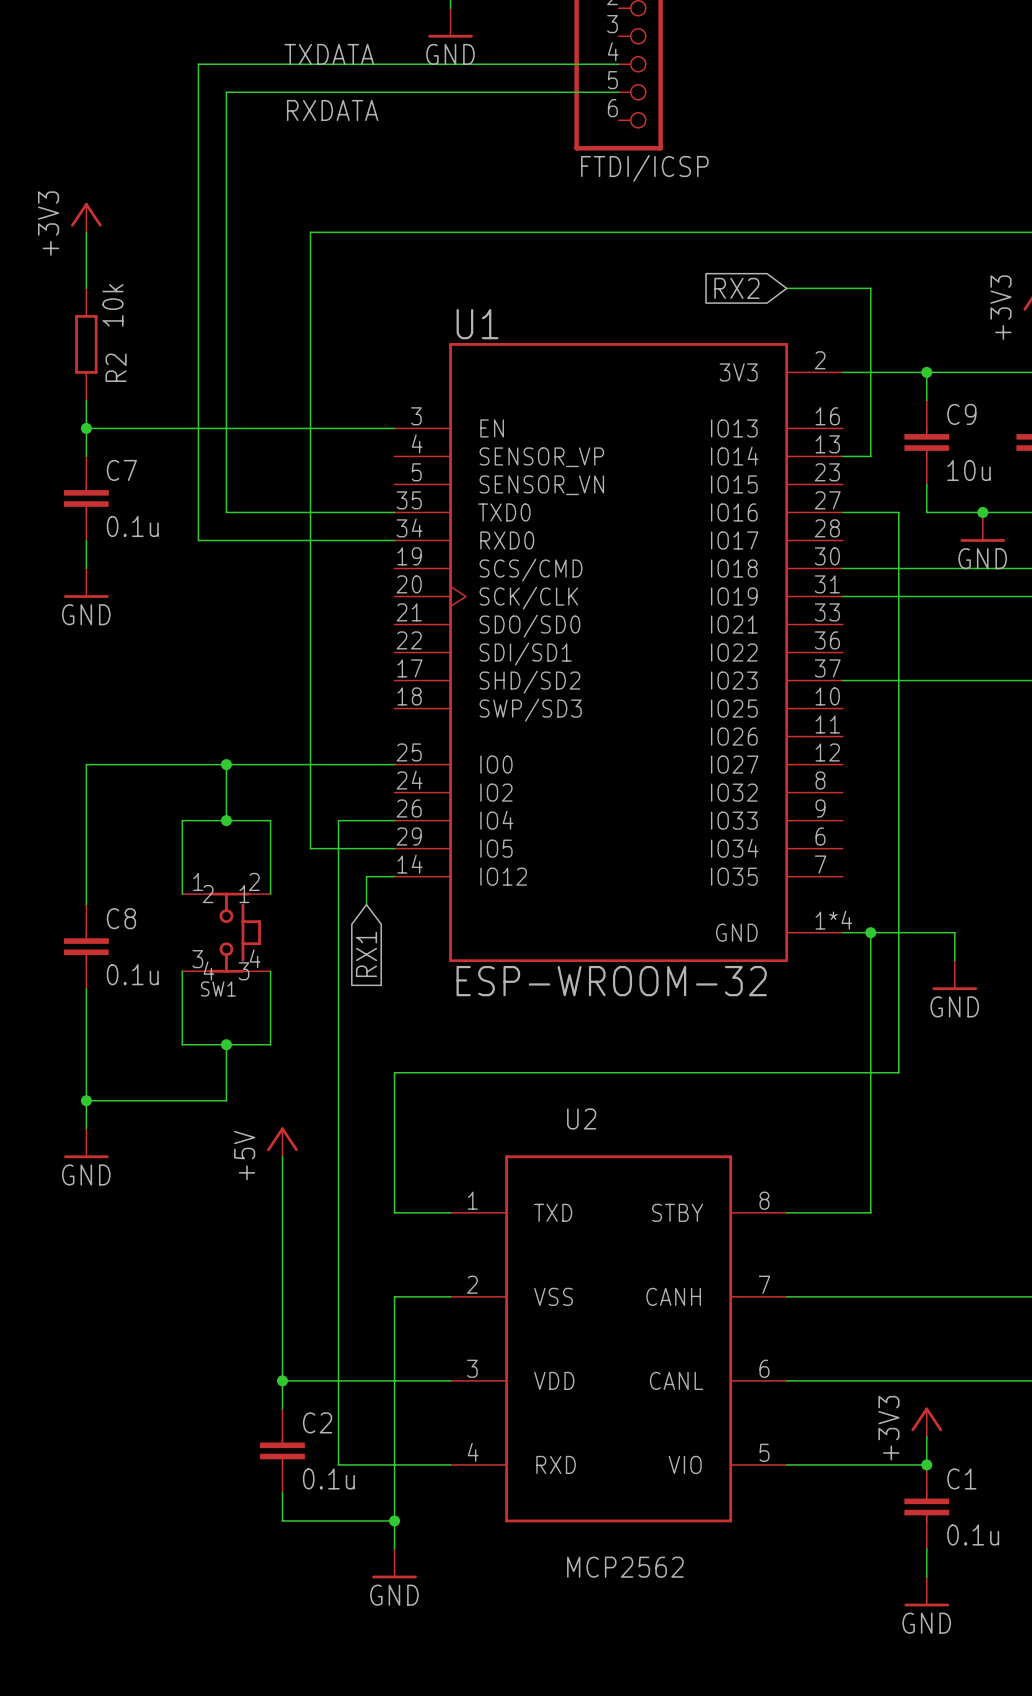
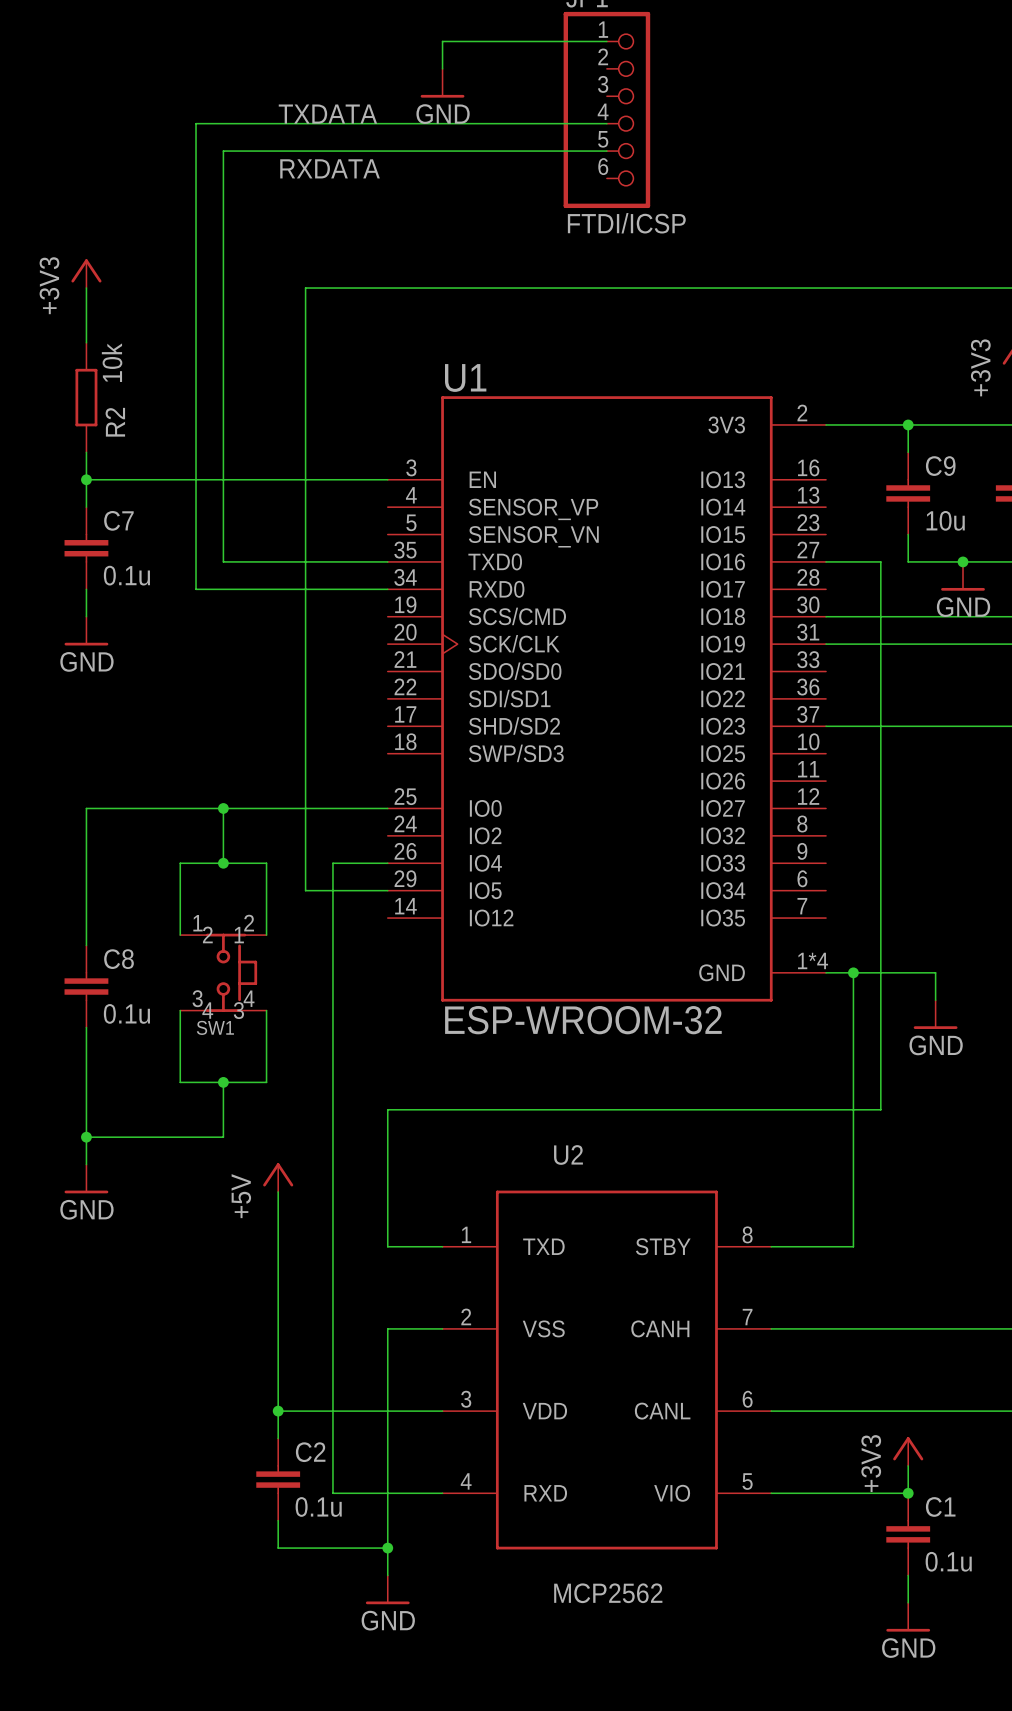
global label: RX2 (736, 288) -> none
wire: (786, 288) (870, 288) (870, 456) (842, 456) -> none
wire: (394, 876) (366, 876) (366, 904) -> none
global label: RX1 (366, 954) -> none

